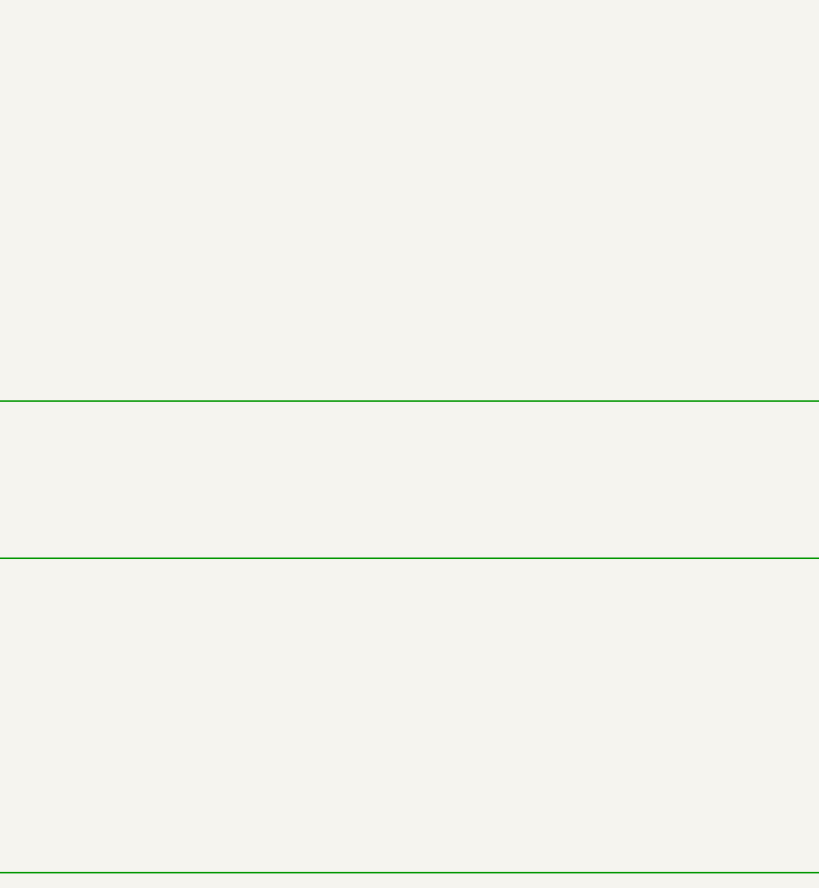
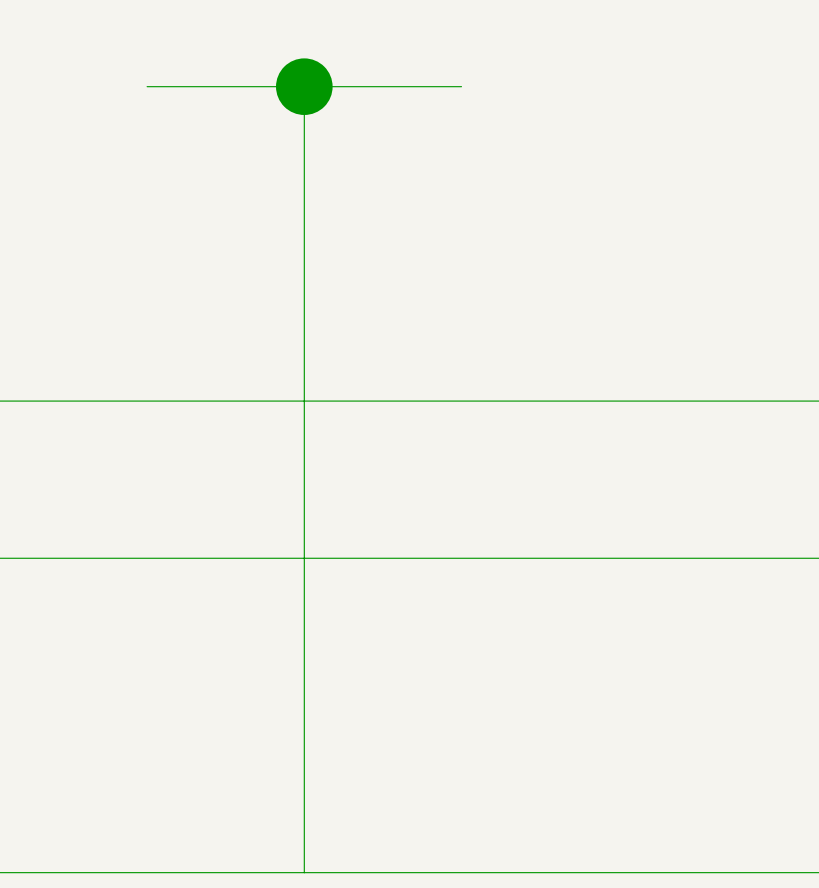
wire: none -> (147, 86) (461, 86)
wire: none -> (304, 86) (304, 872)
junction: none -> (304, 86)

